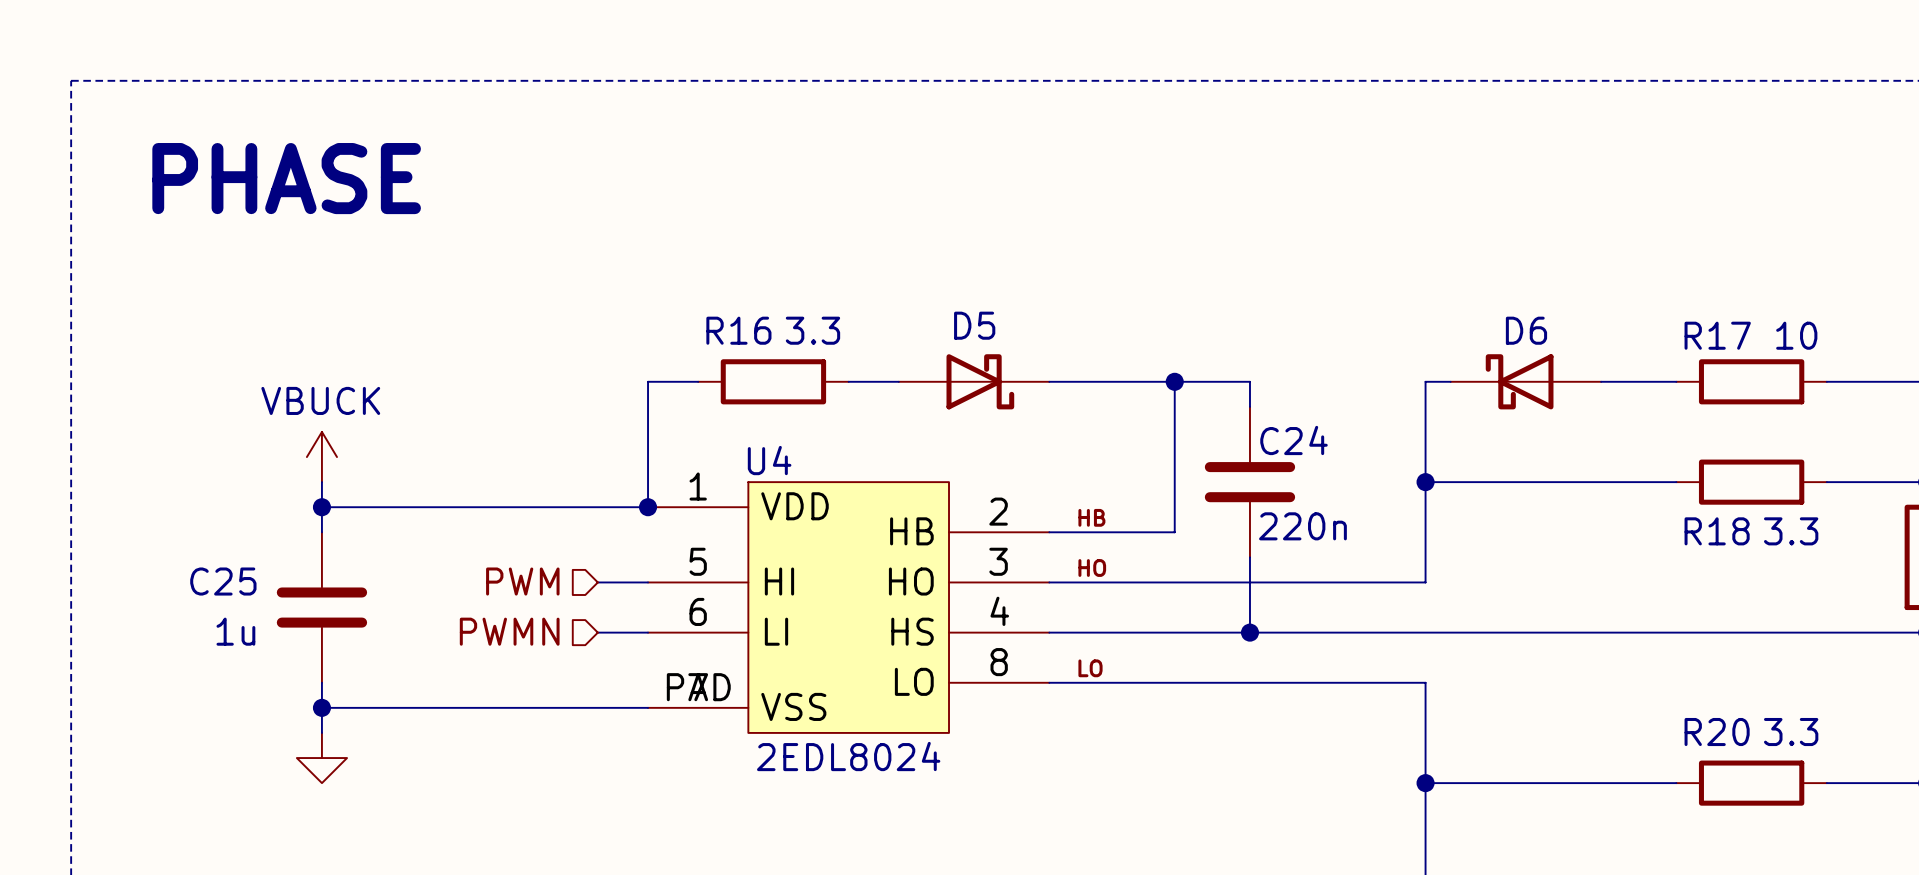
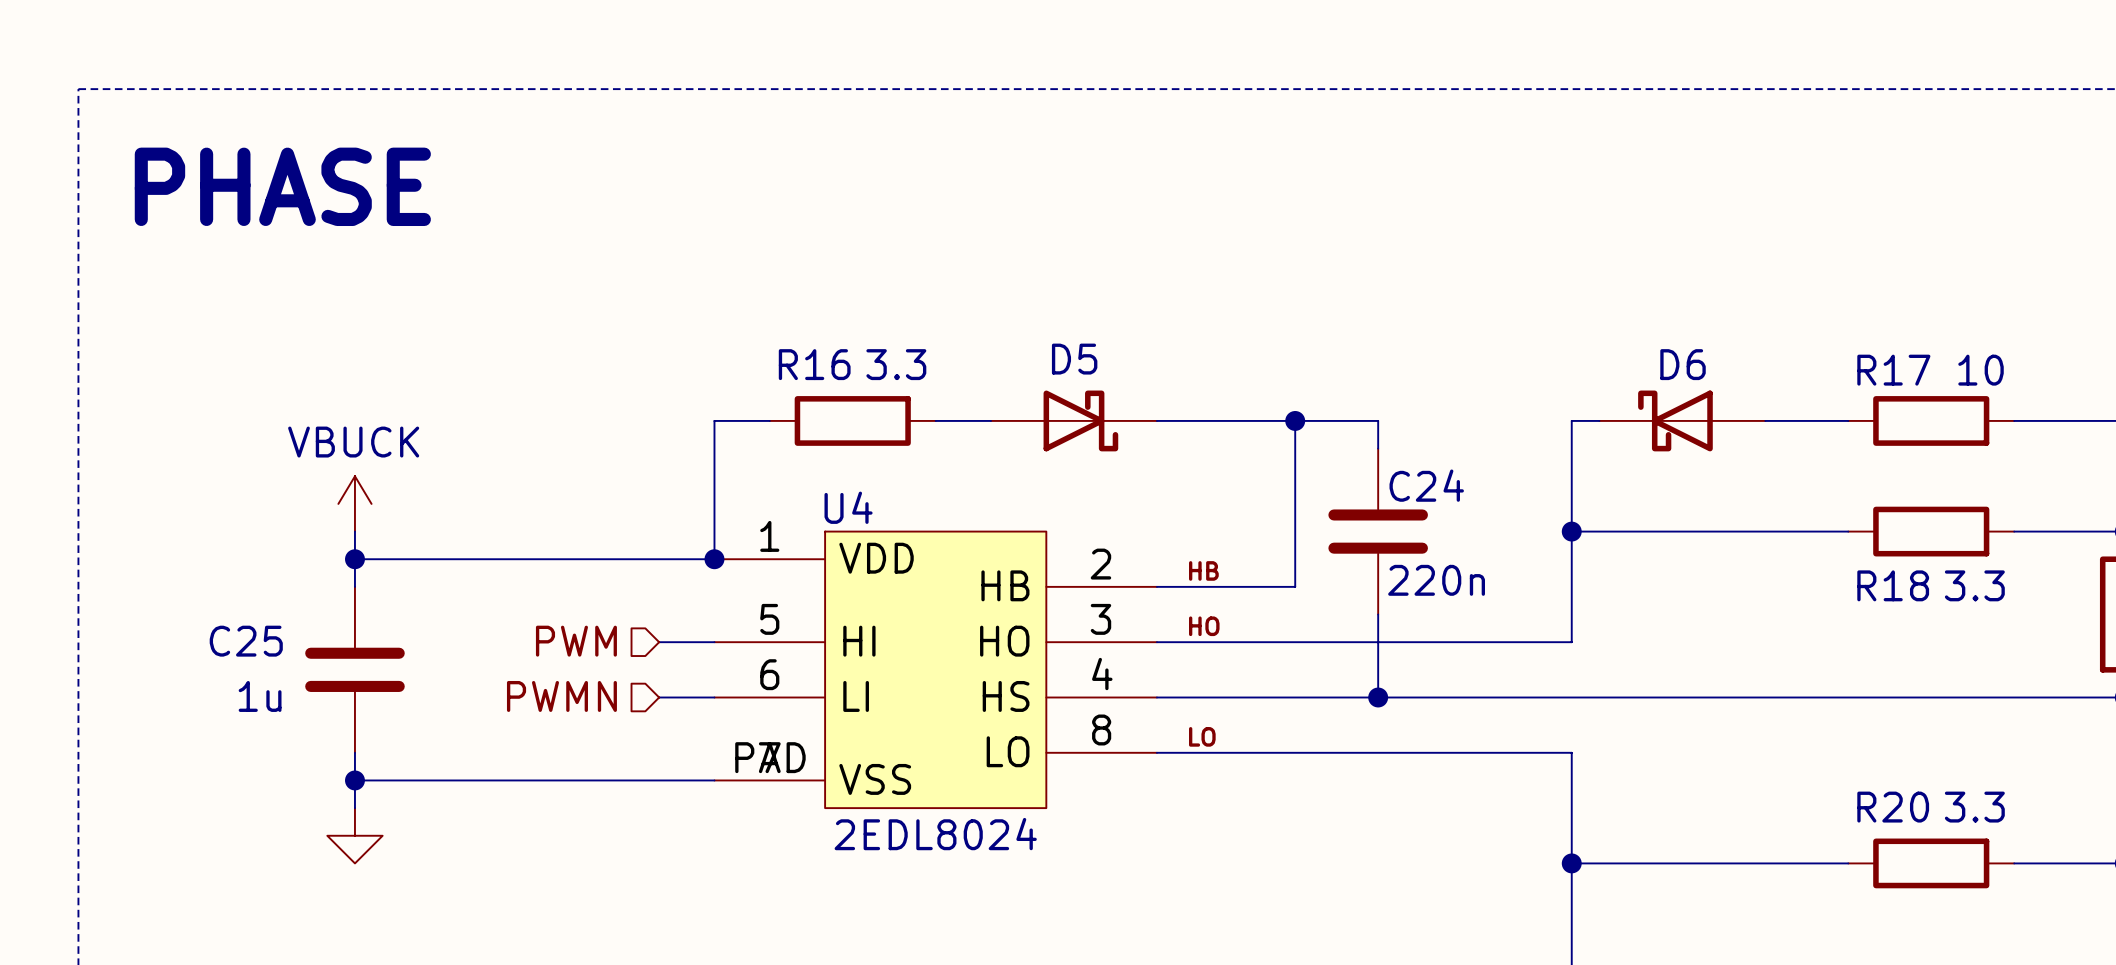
text position: PHASE (286, 178) -> PHASE (282, 186)

